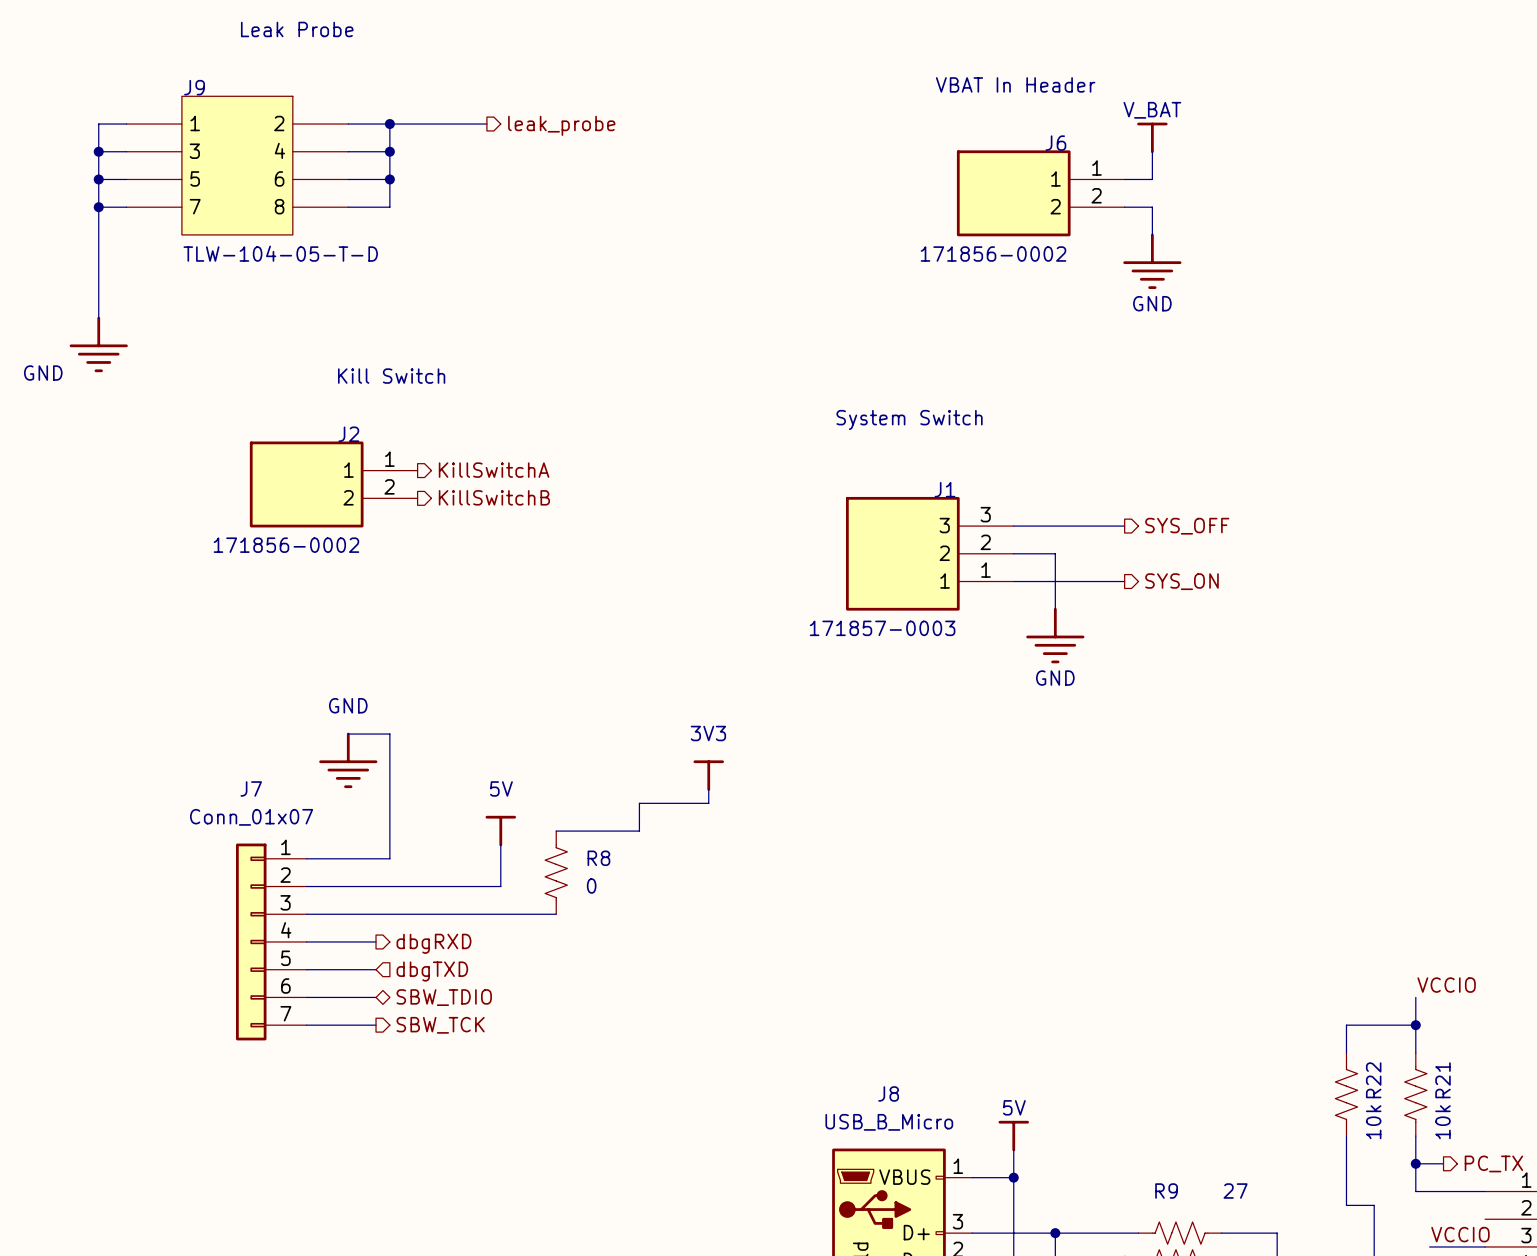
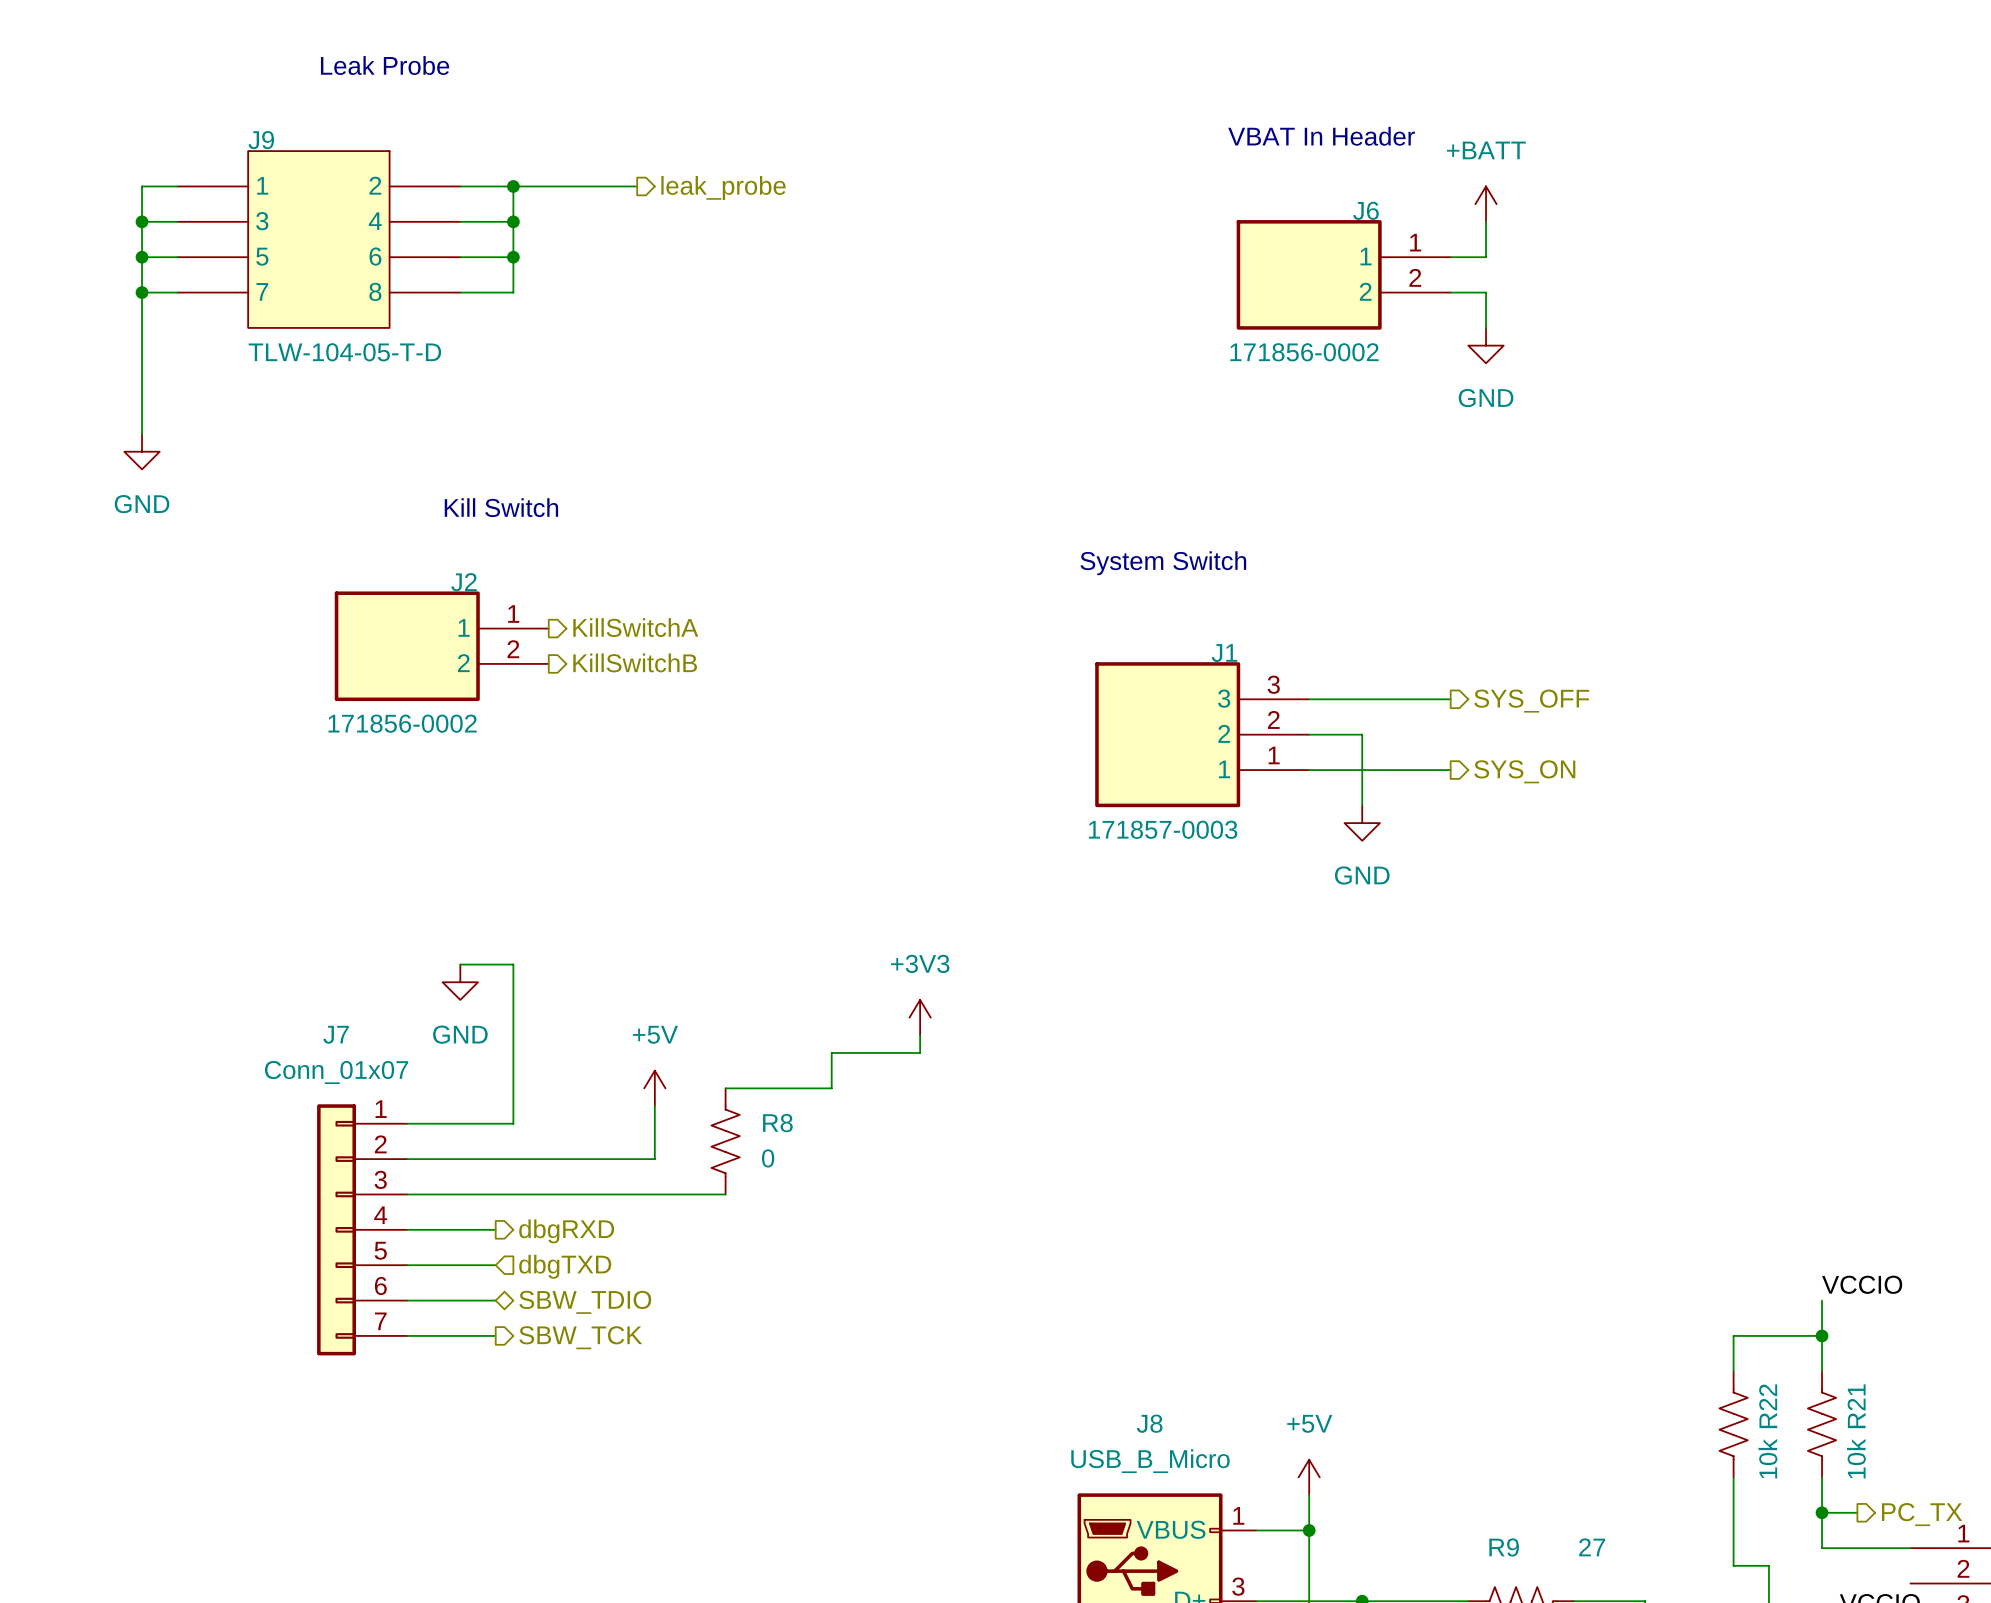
power symbol: V_BAT (1152, 137) -> +BATT (1486, 204)
power symbol: none -> GND (1486, 345)
power symbol: GND (1152, 261) -> none
power symbol: none -> GND (142, 451)
power symbol: GND (98, 344) -> none
power symbol: none -> GND (1362, 823)
power symbol: GND (1055, 635) -> none
power symbol: none -> GND (460, 982)
power symbol: GND (348, 760) -> none
power symbol: 3V3 (708, 775) -> +3V3 (920, 1017)
power symbol: 5V (500, 831) -> +5V (654, 1088)
power symbol: 5V (1013, 1136) -> +5V (1309, 1477)

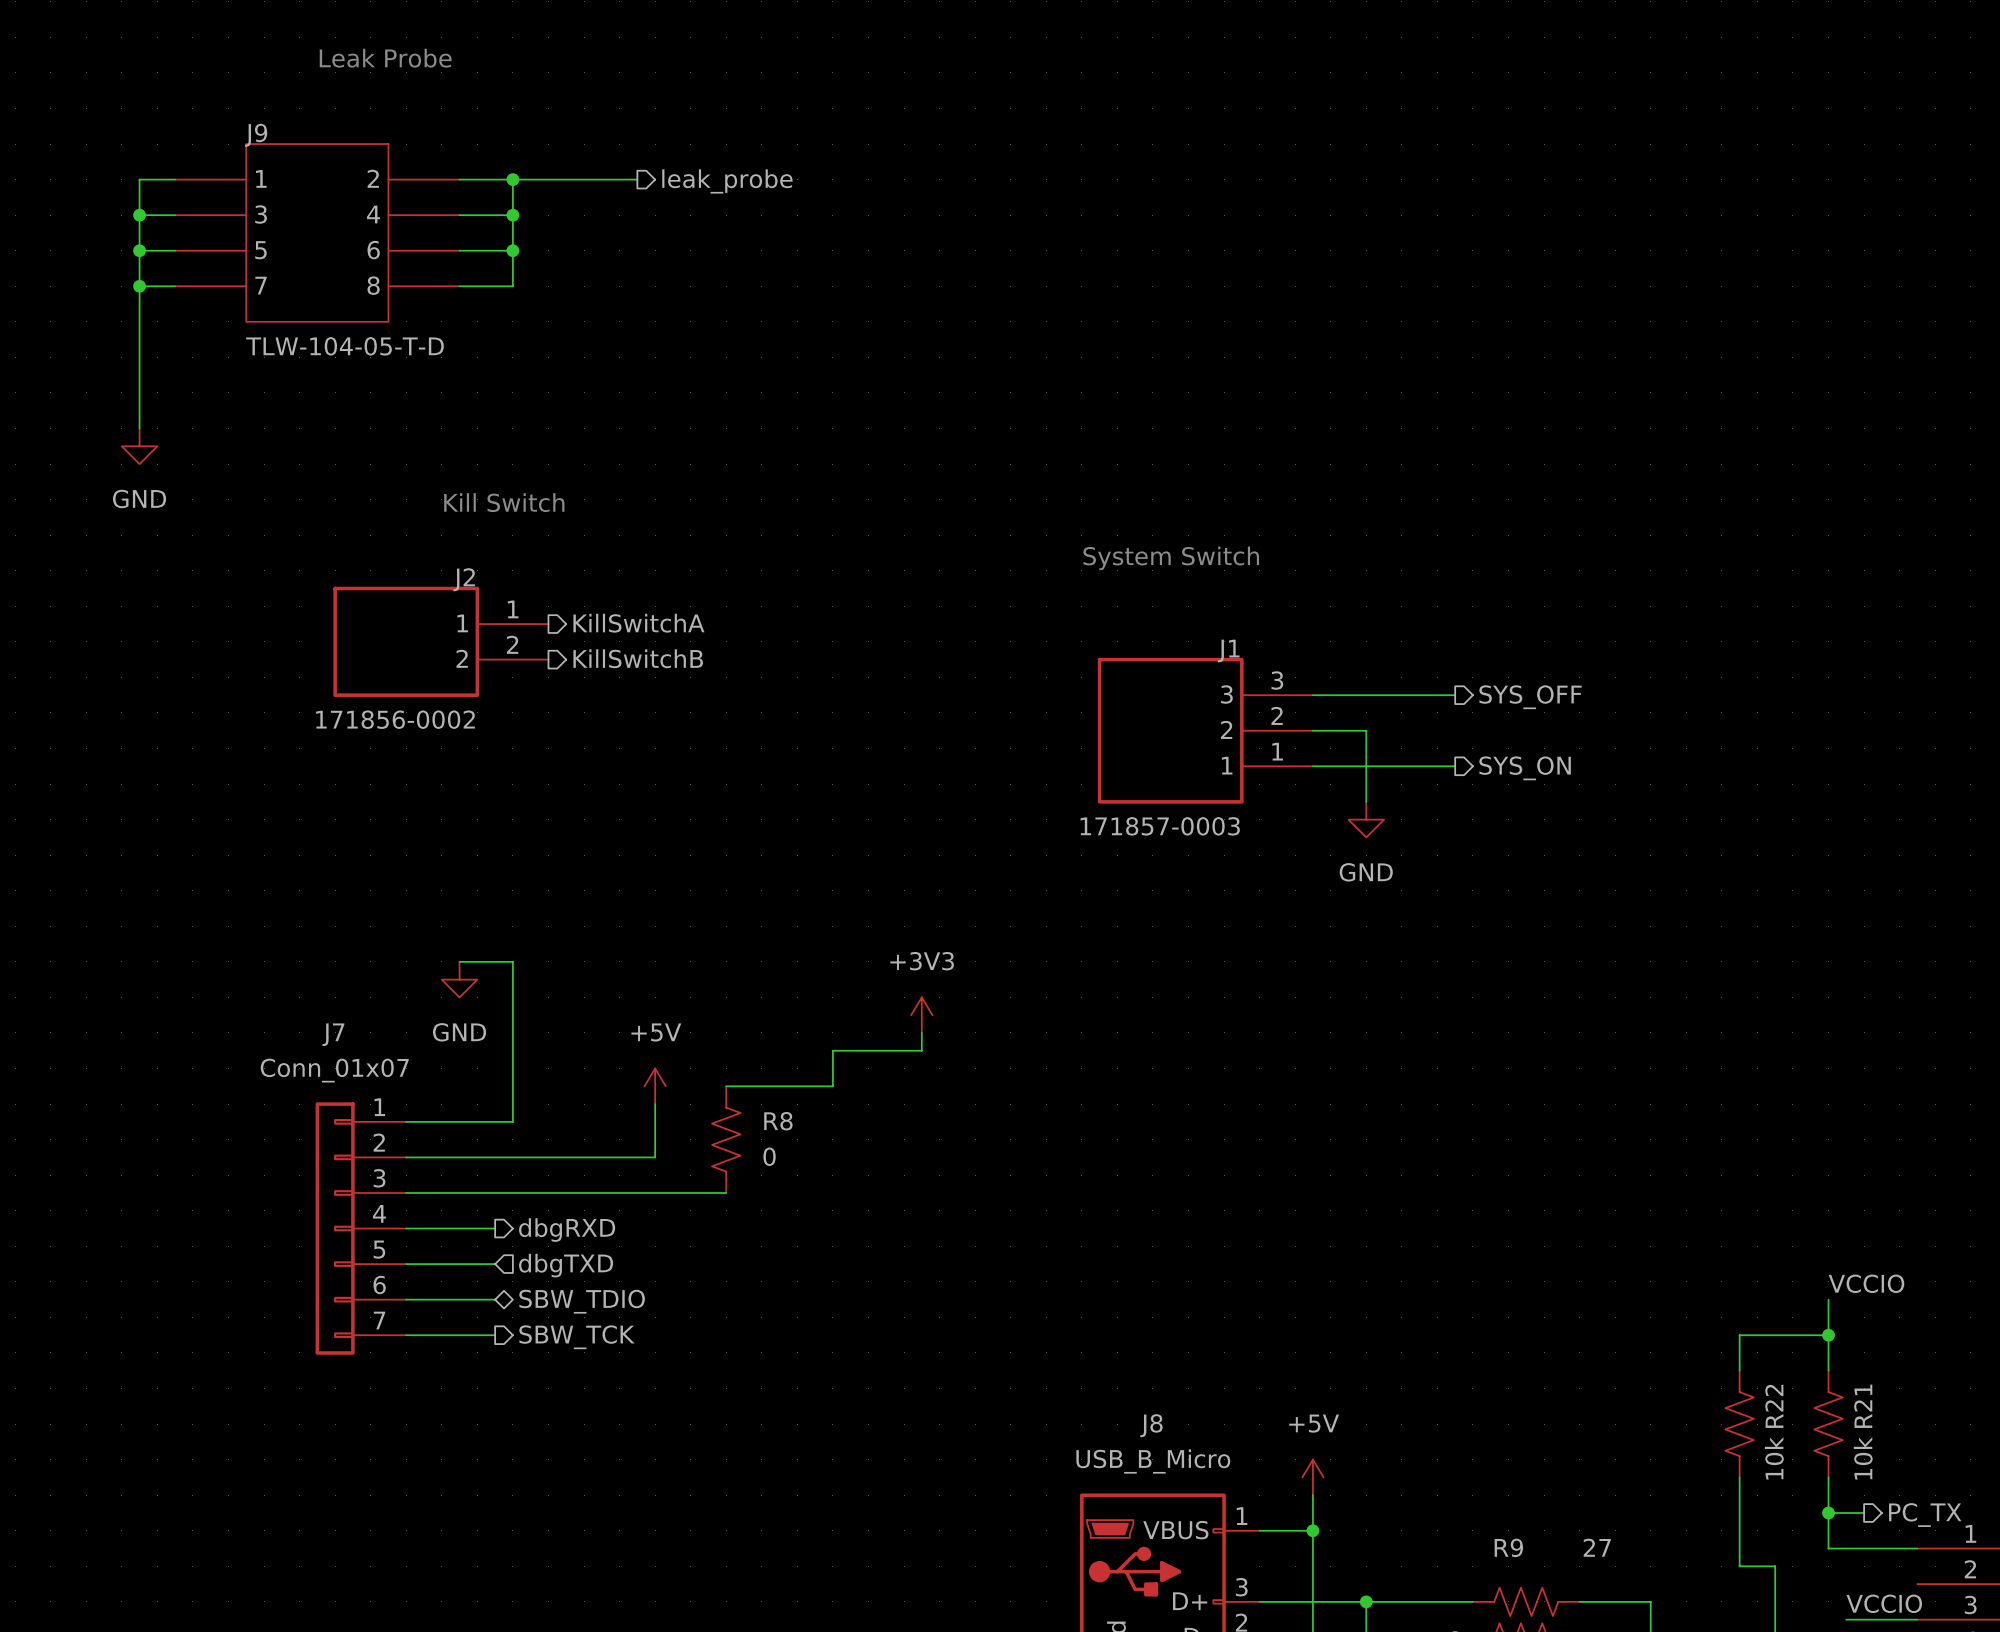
text: VBAT In Header (1321, 136) -> none
power symbol: +BATT (1486, 204) -> none
wire: (1486, 221) (1486, 257) (1450, 257) -> none
J6: 171856-0002 (1343, 274) -> none
wire: (1450, 292) (1486, 292) (1486, 327) -> none
power symbol: GND (1486, 345) -> none

